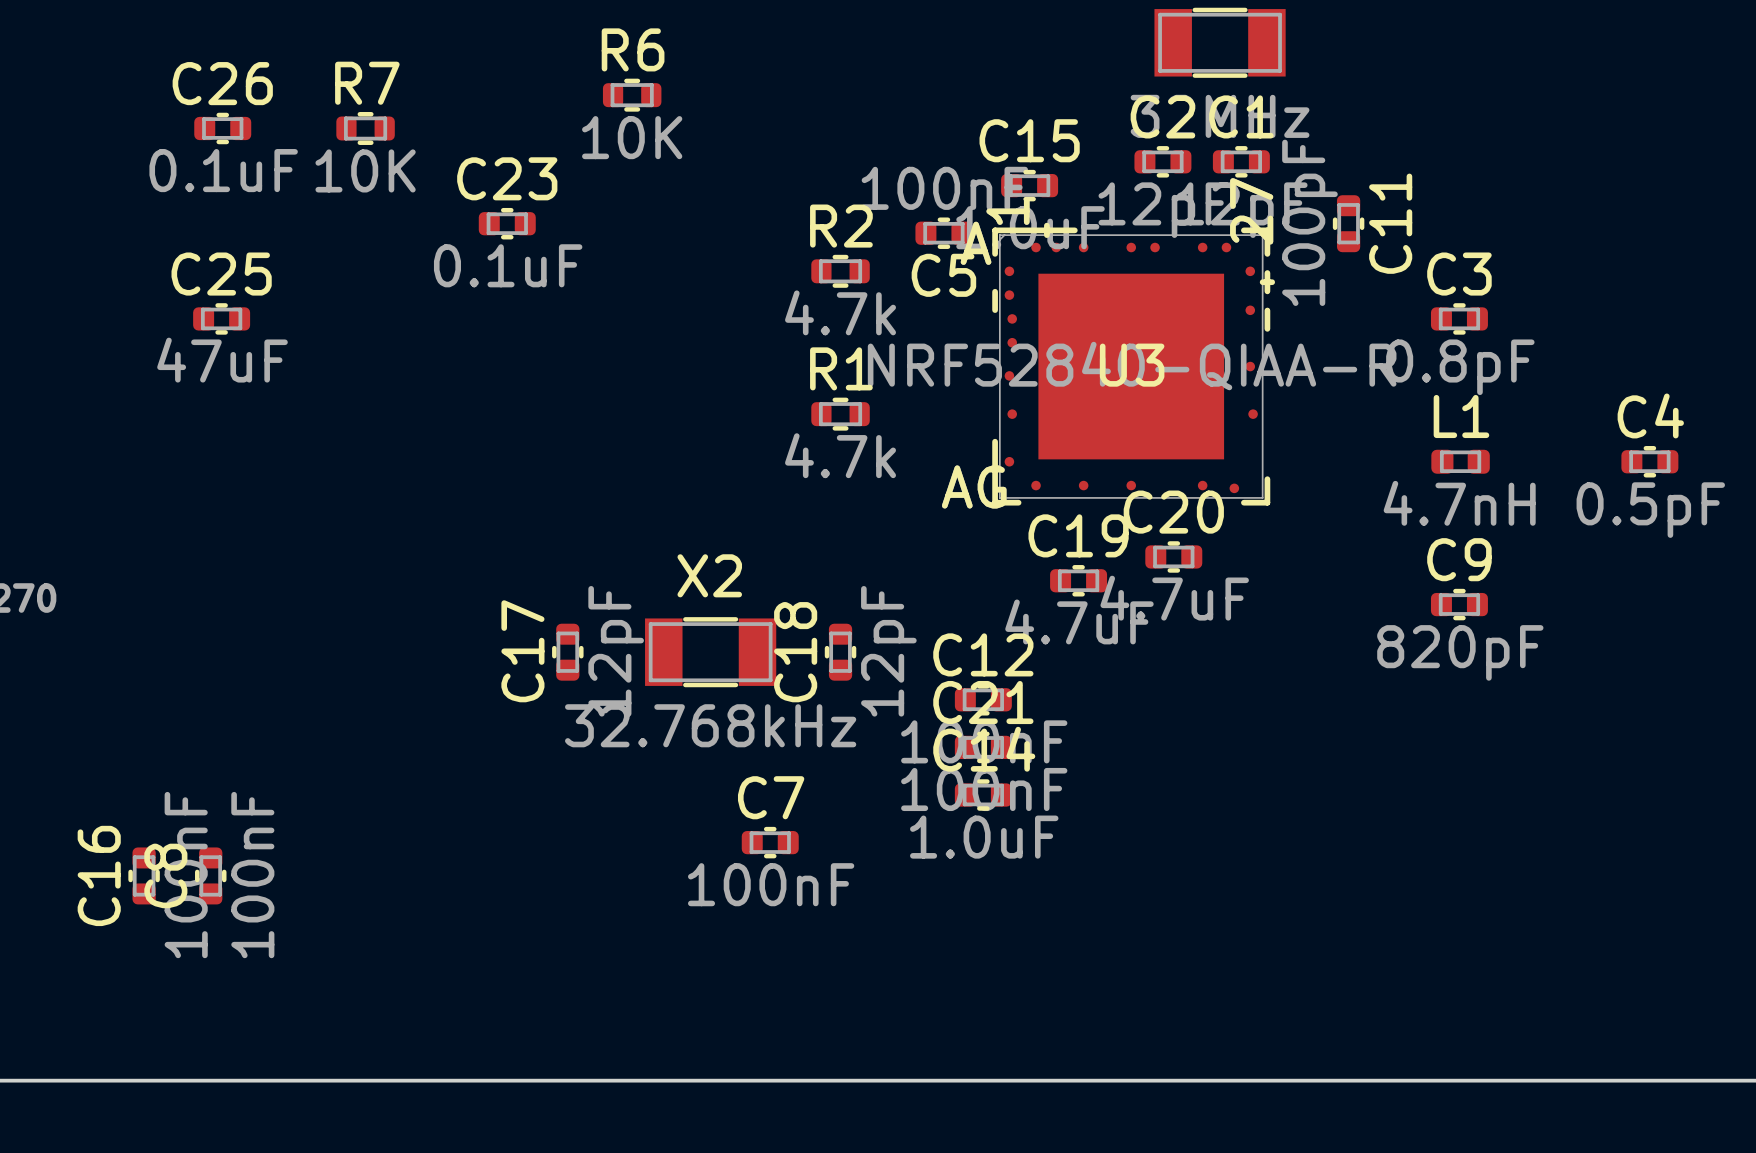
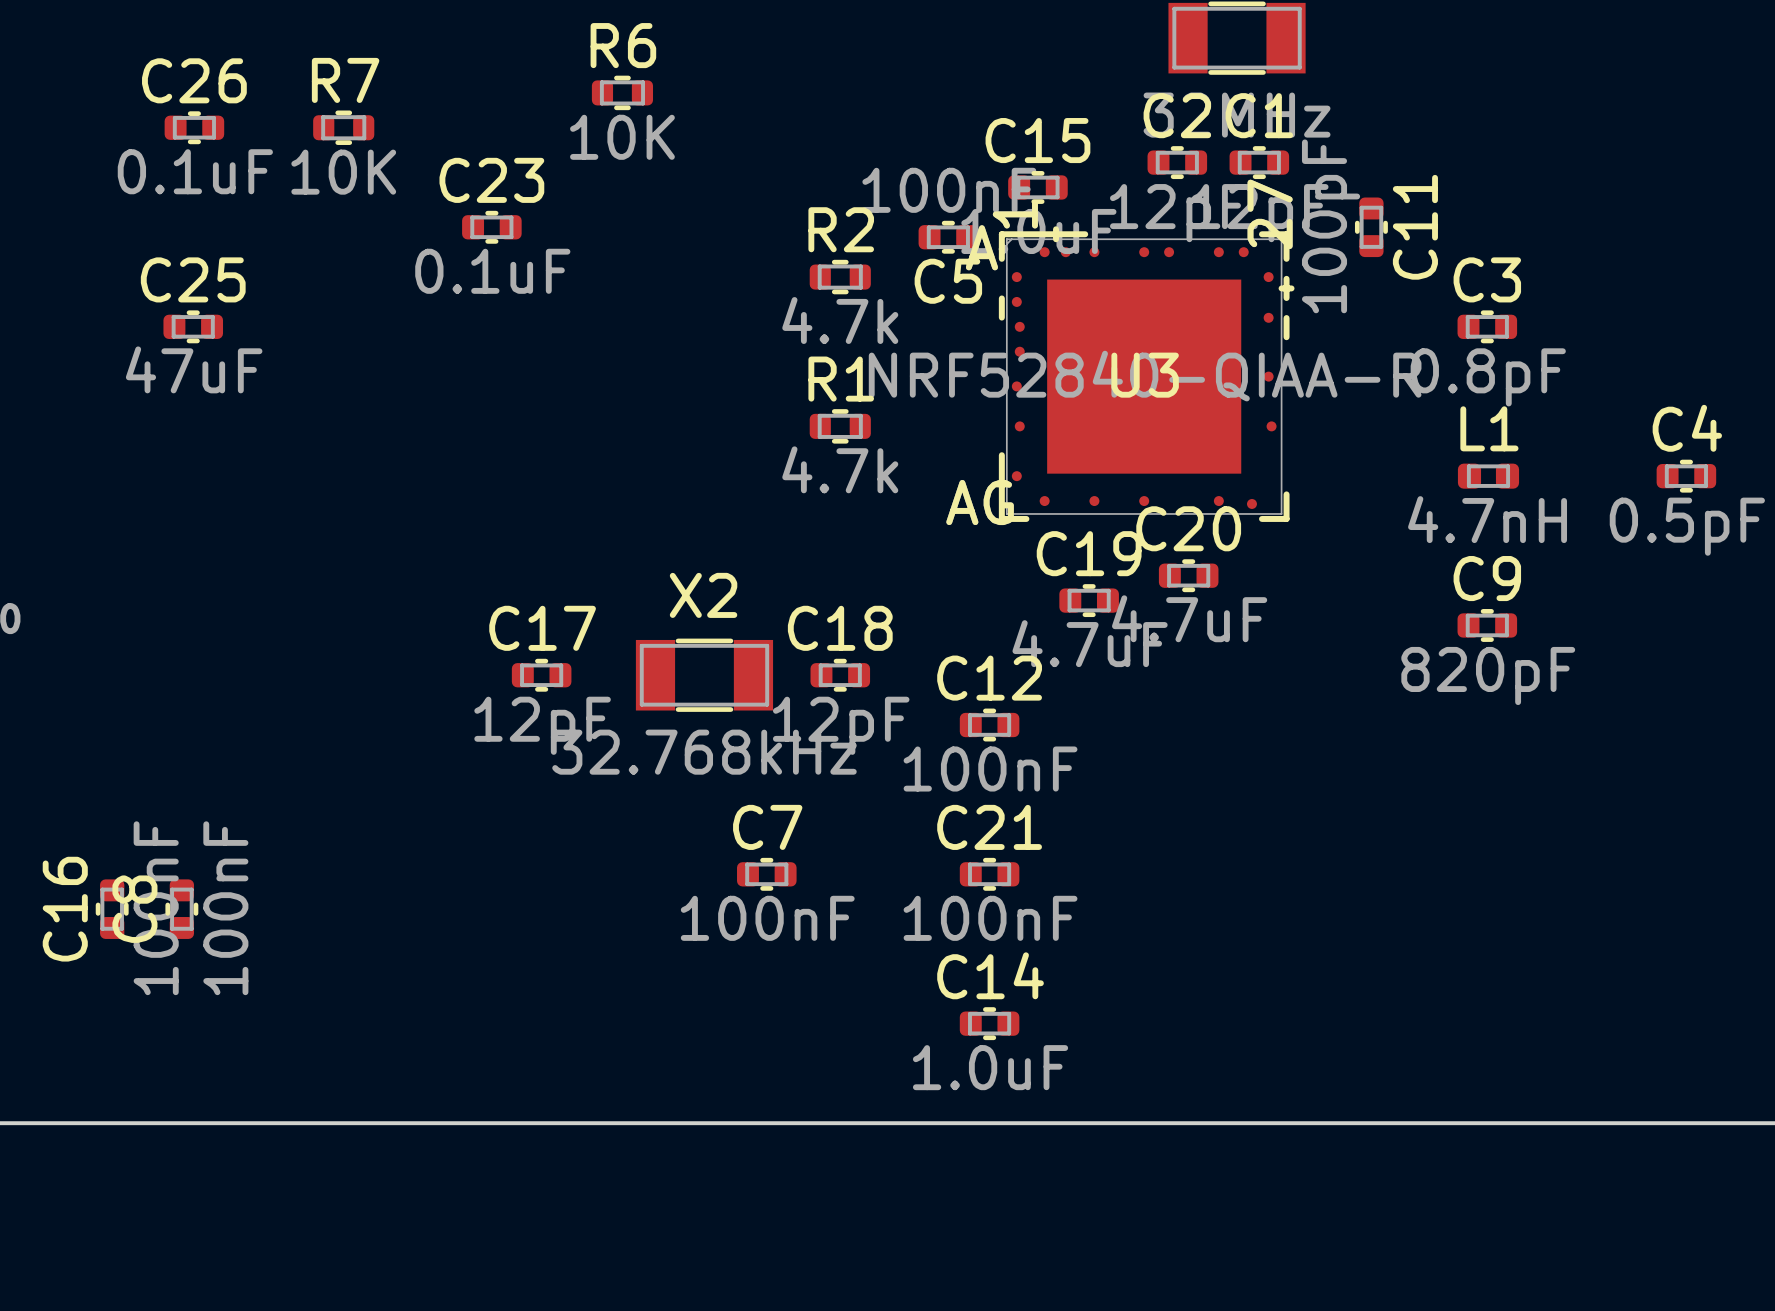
C17 rotation: 0° (567, 652) -> 90° clockwise (541, 675)
C18 rotation: 0° (840, 652) -> 90° clockwise (840, 675)
C21 position: (983, 747) -> (989, 874)
C14 position: (983, 795) -> (989, 1023)

